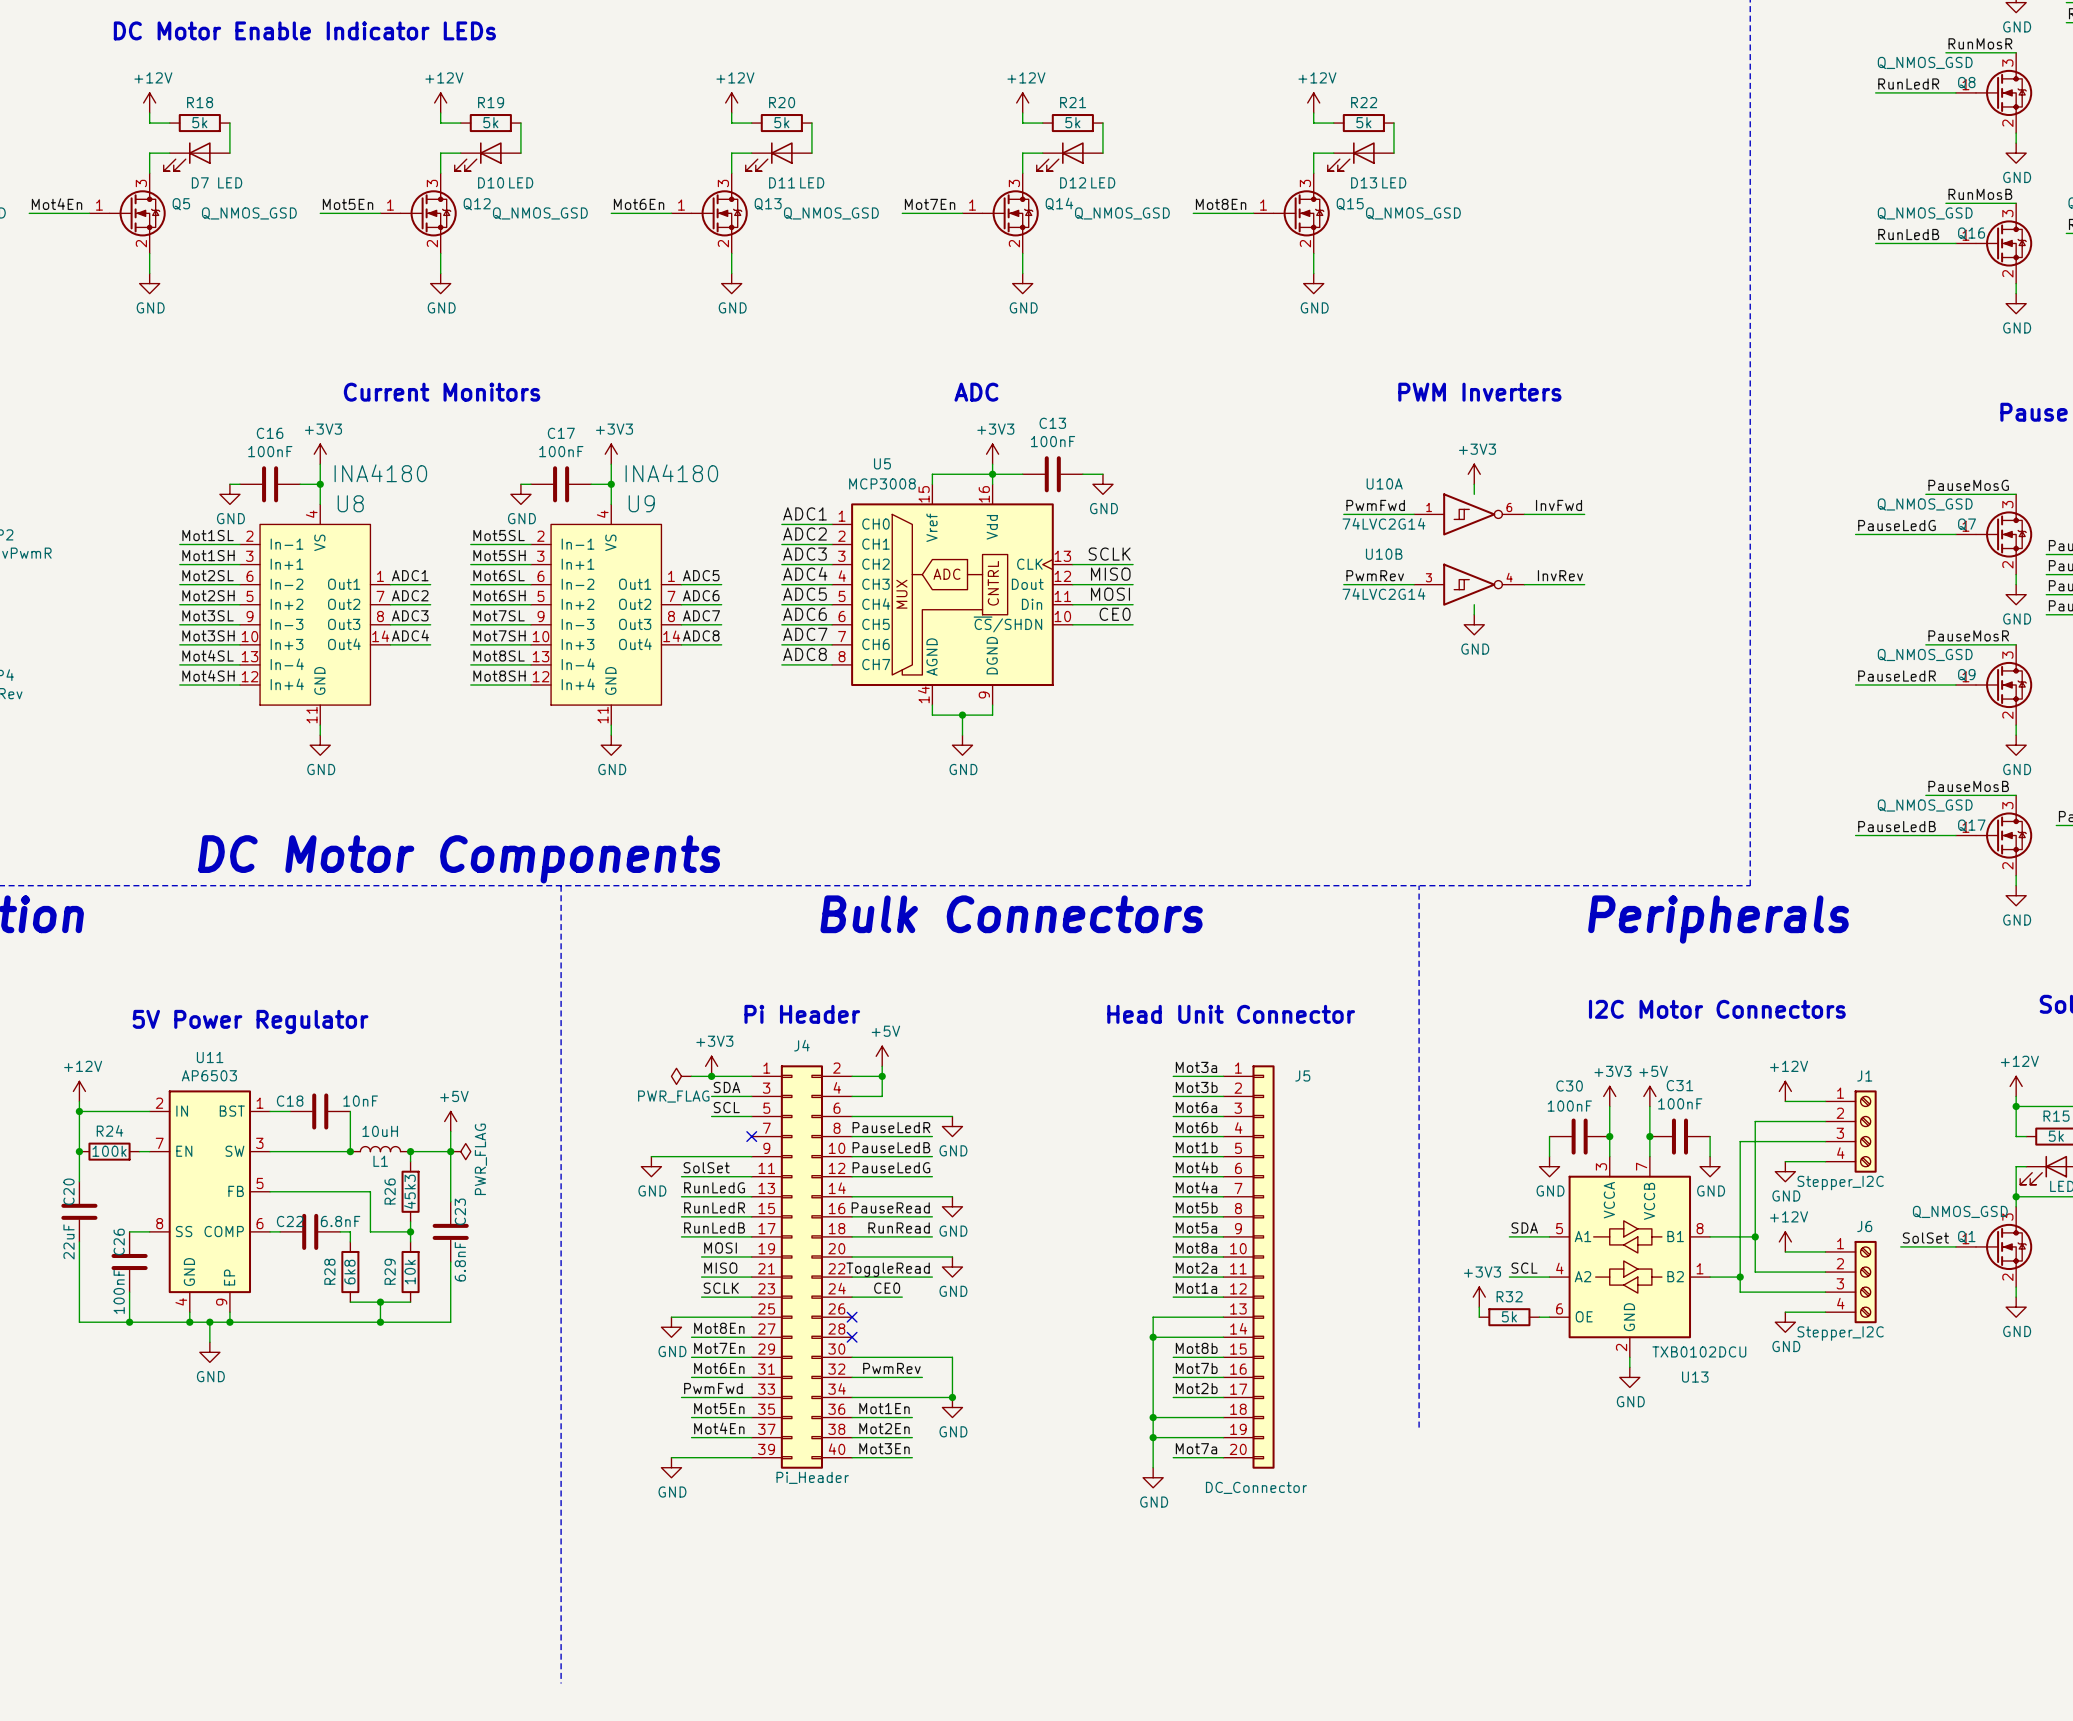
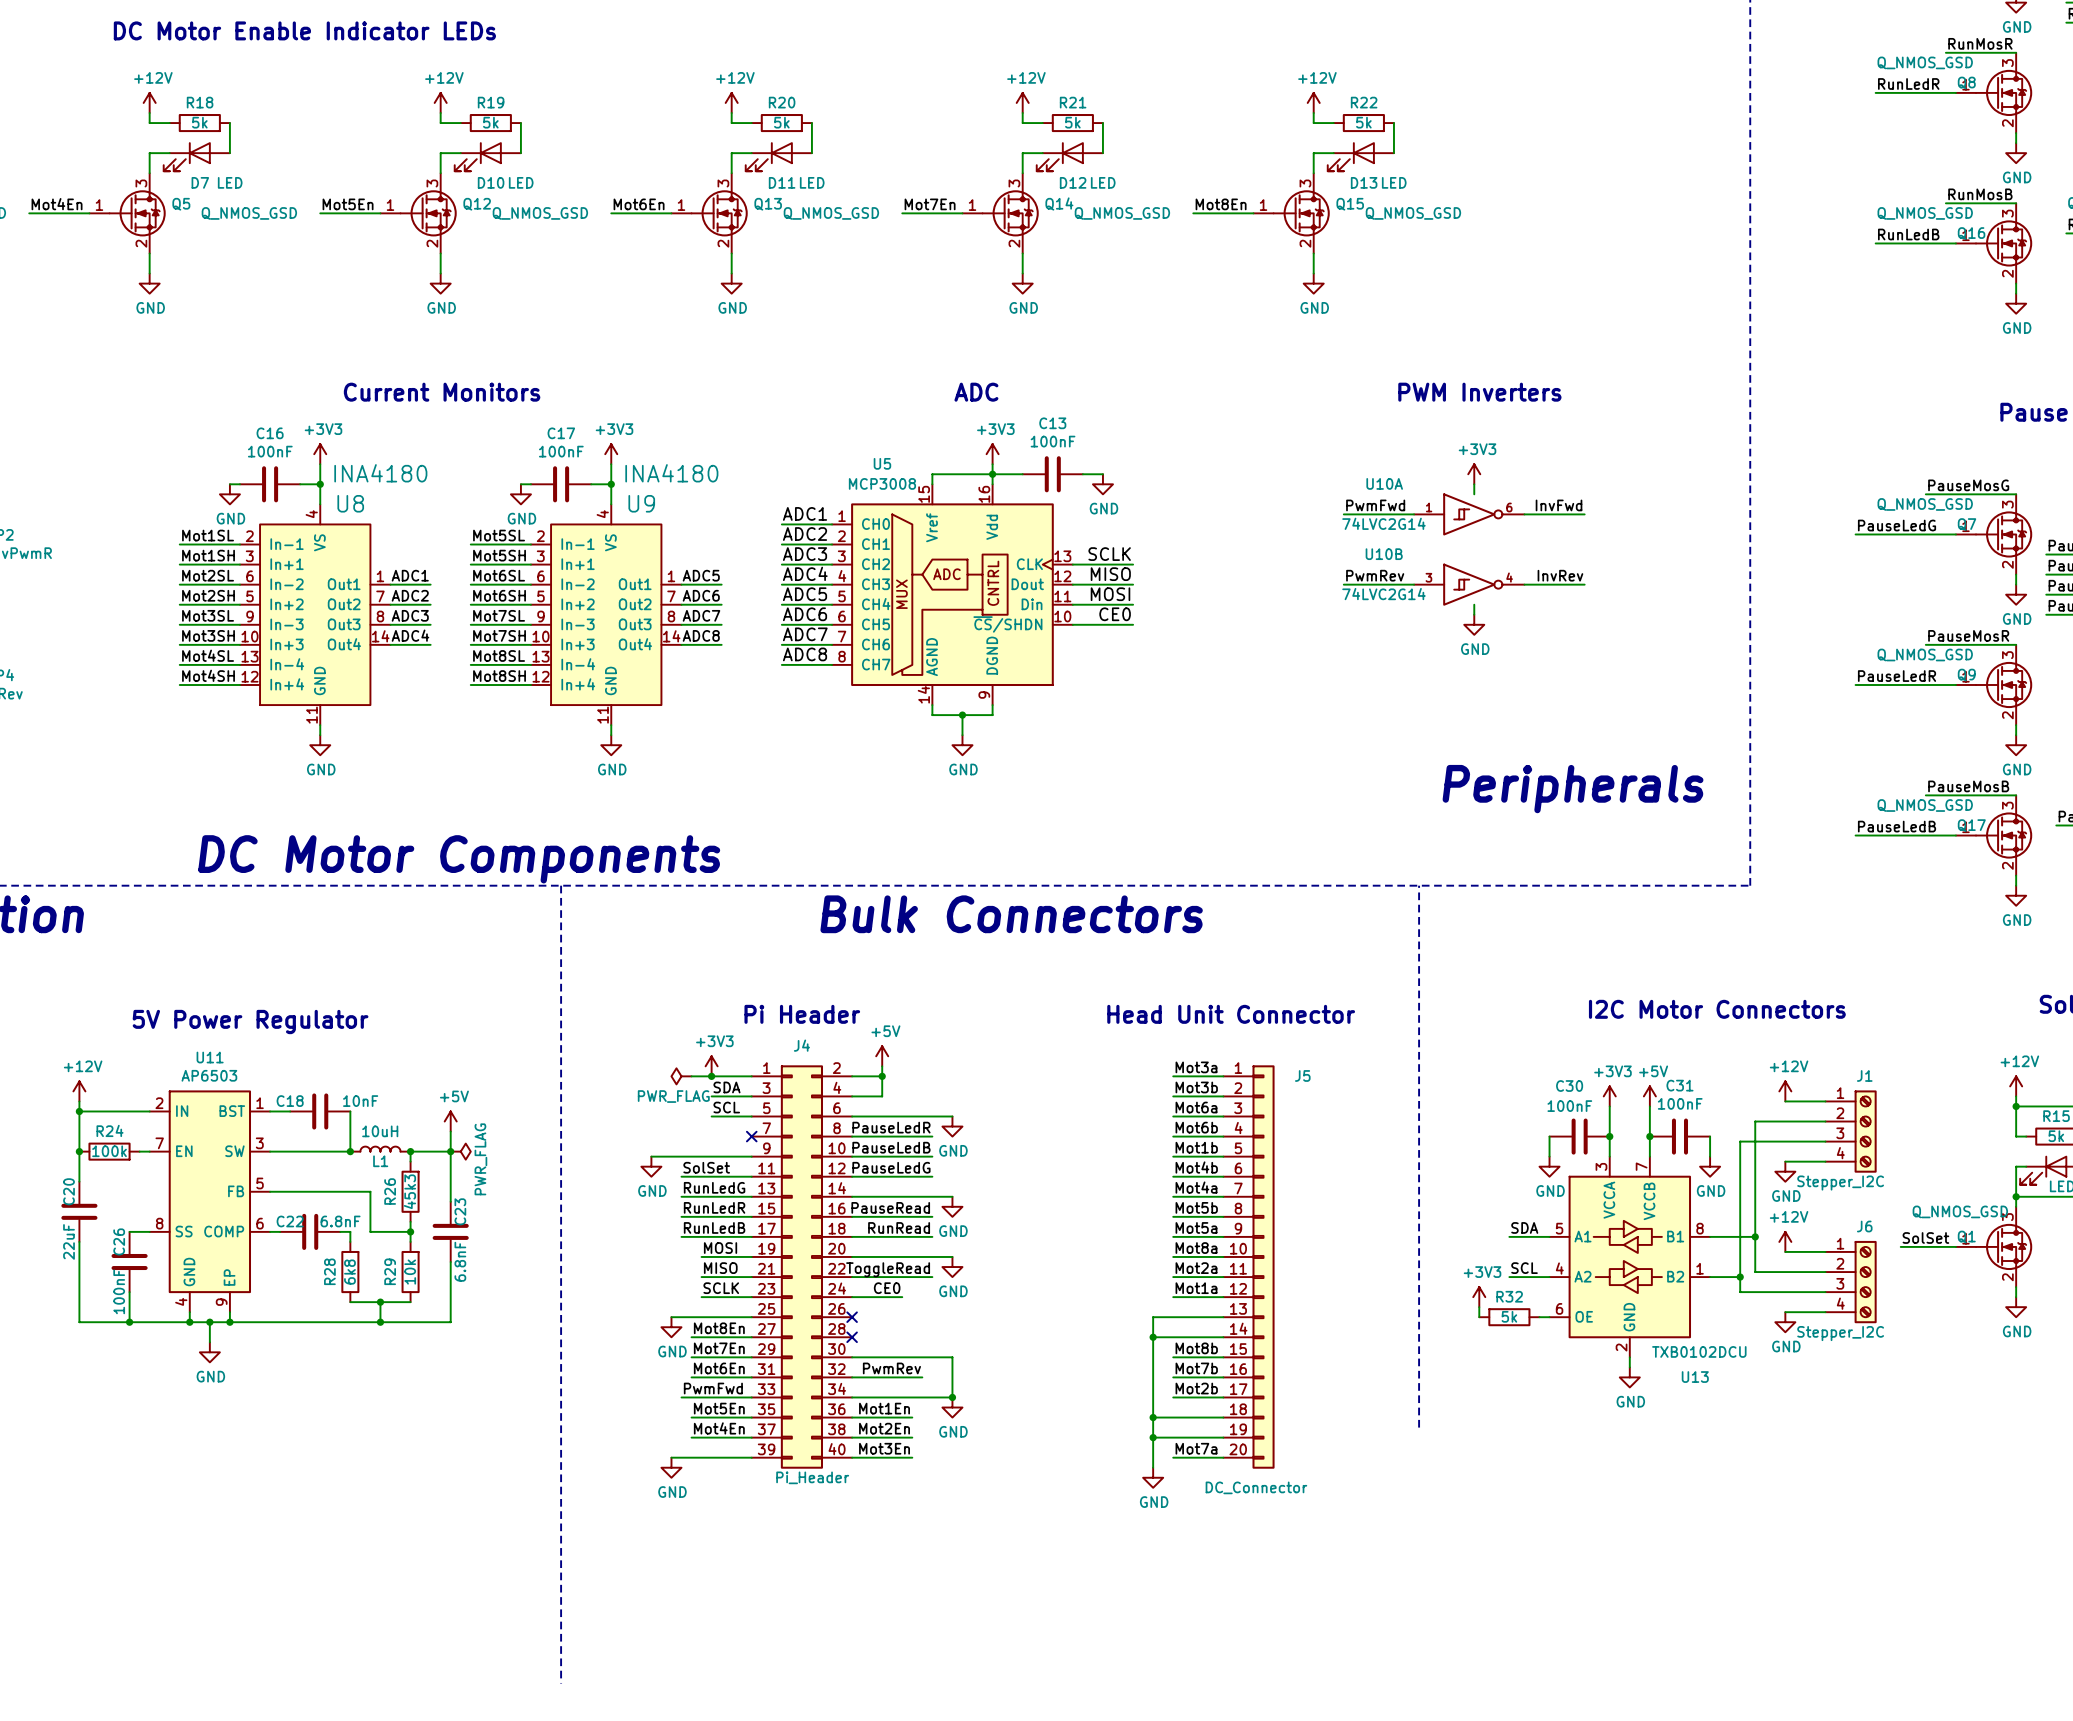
text position: Peripherals (1718, 919) -> Peripherals (1573, 789)

